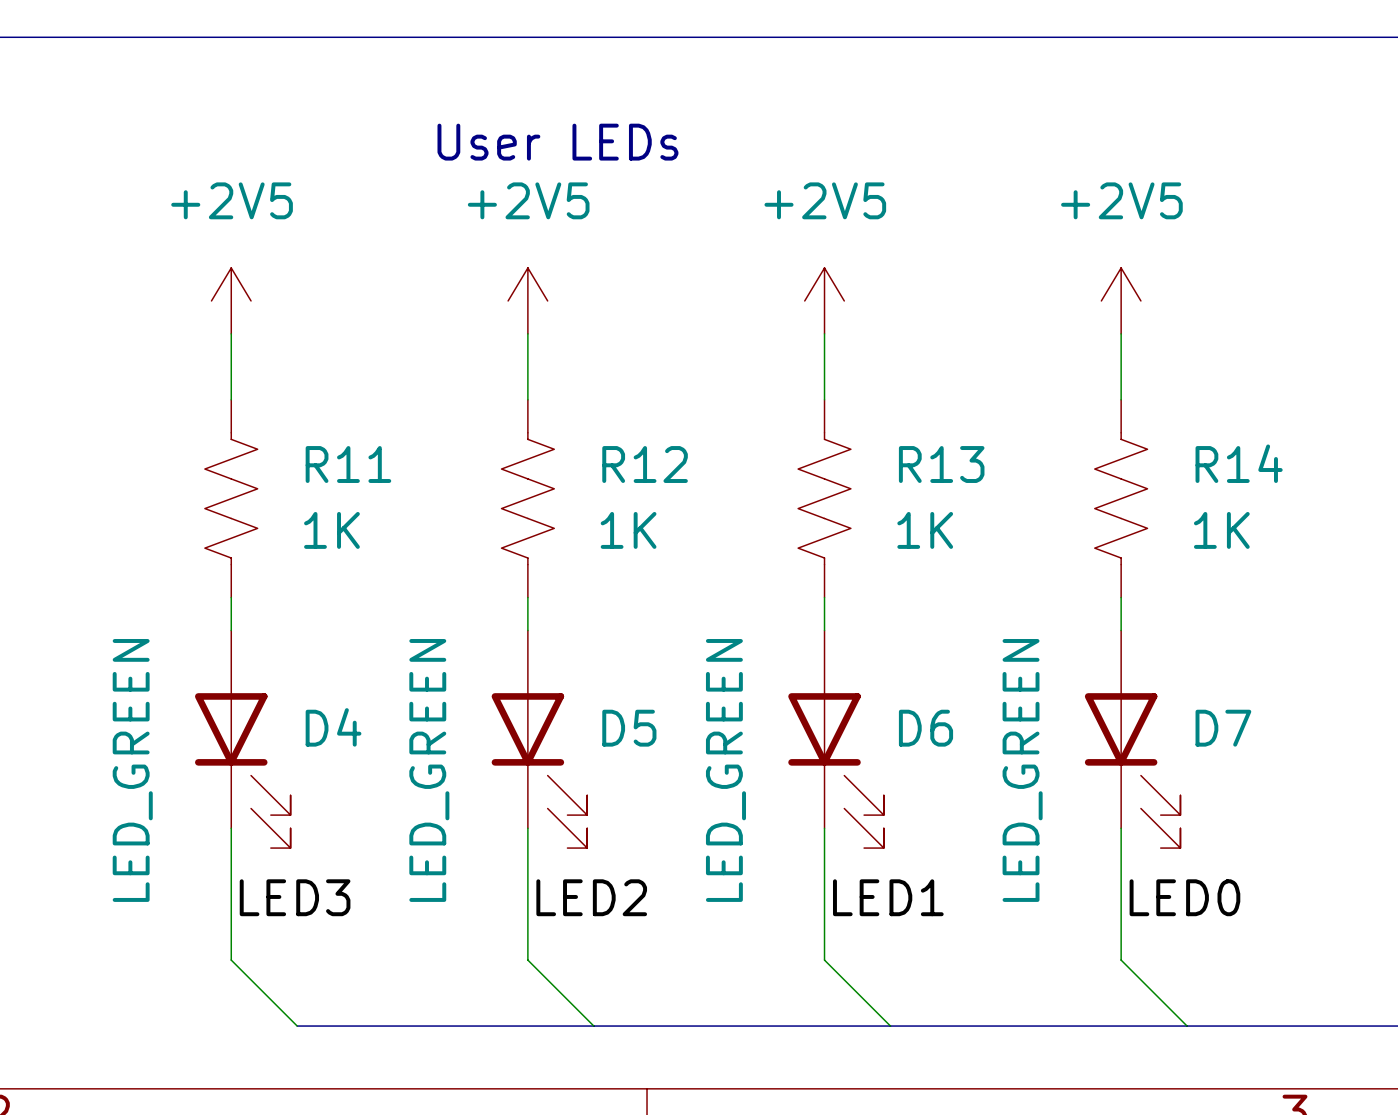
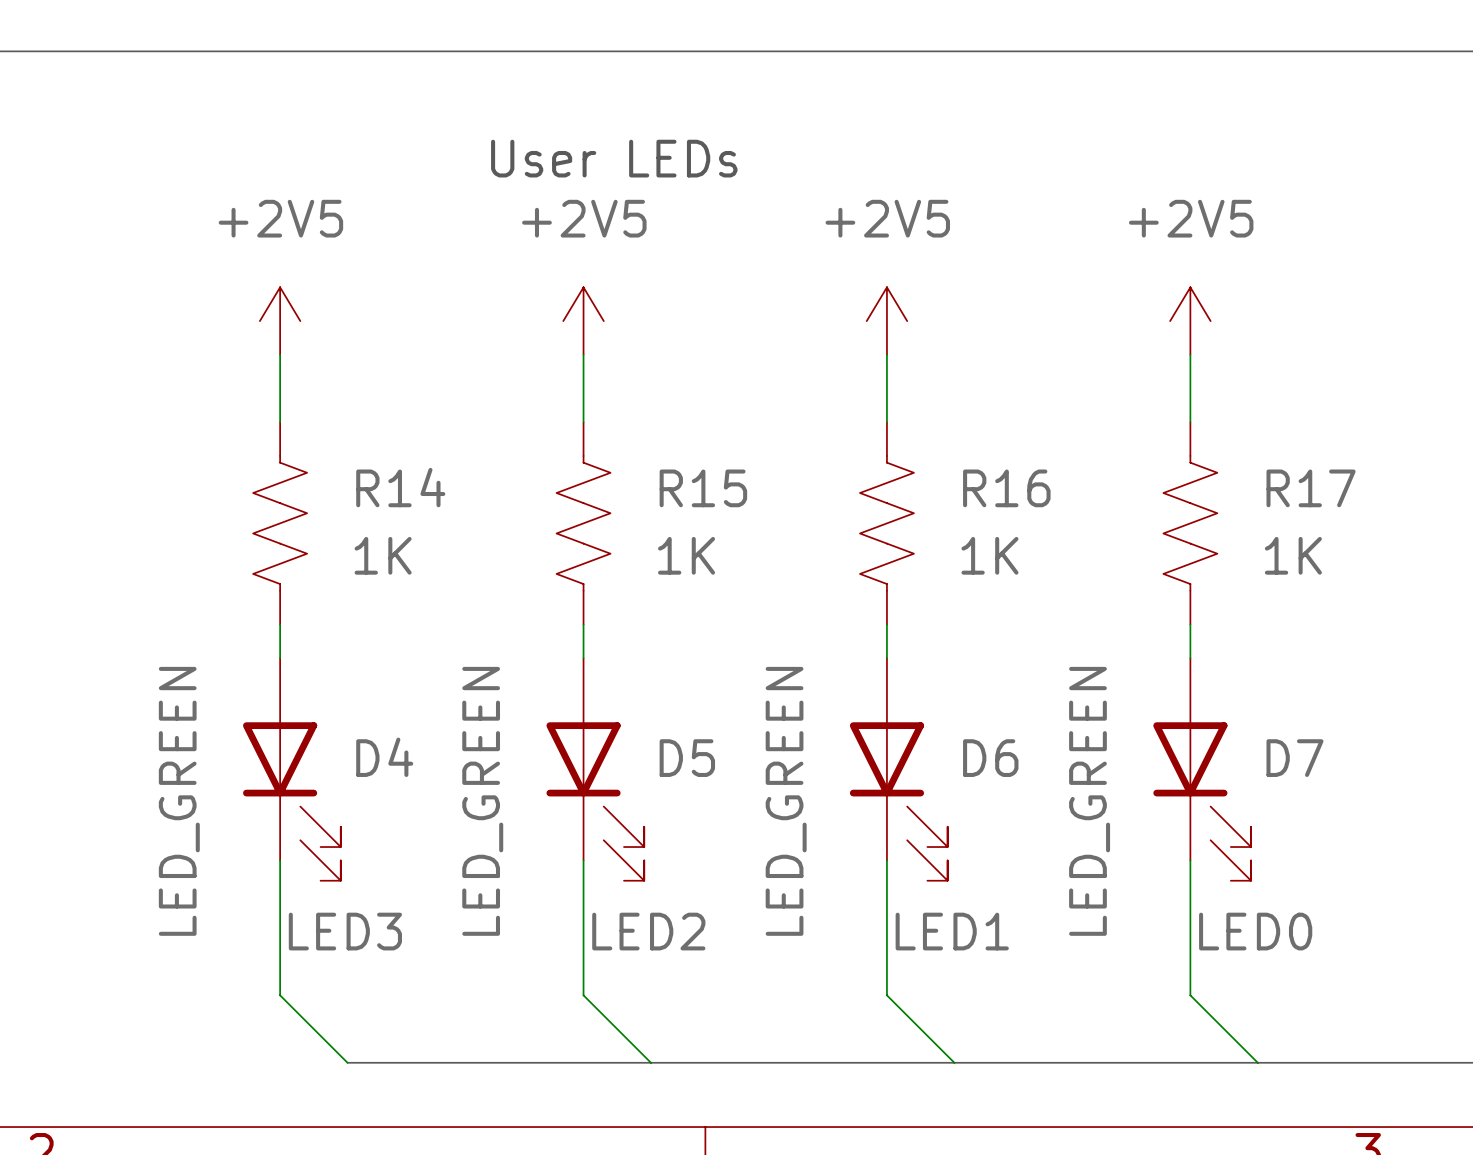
R14 name: R14 (1239, 463) -> R17 (1311, 488)
R11 name: R11 (348, 464) -> R14 (400, 487)
R12 name: R12 (645, 464) -> R15 (703, 488)
R13 name: R13 (941, 464) -> R16 (1006, 488)

